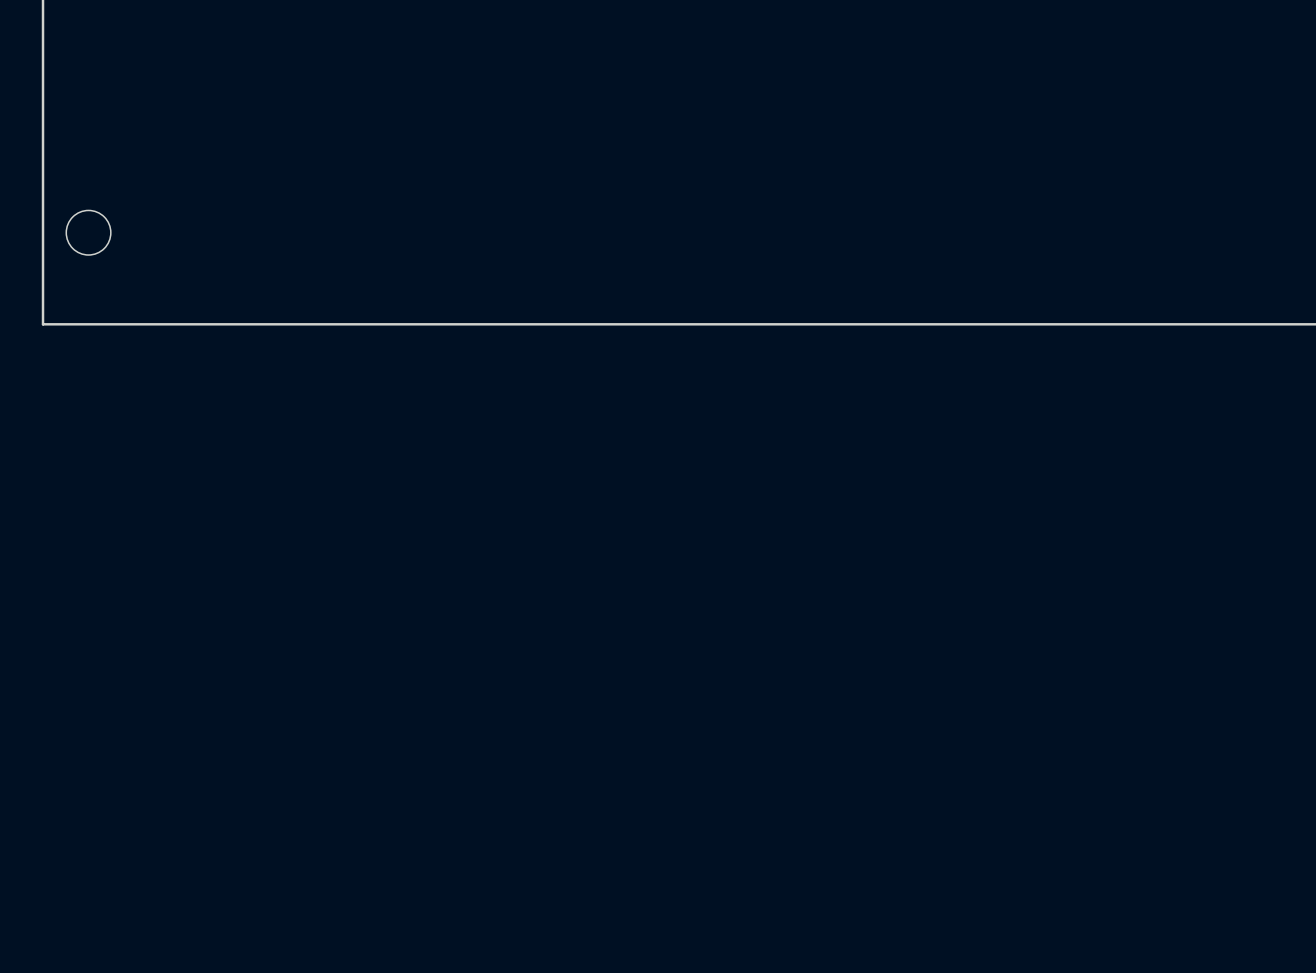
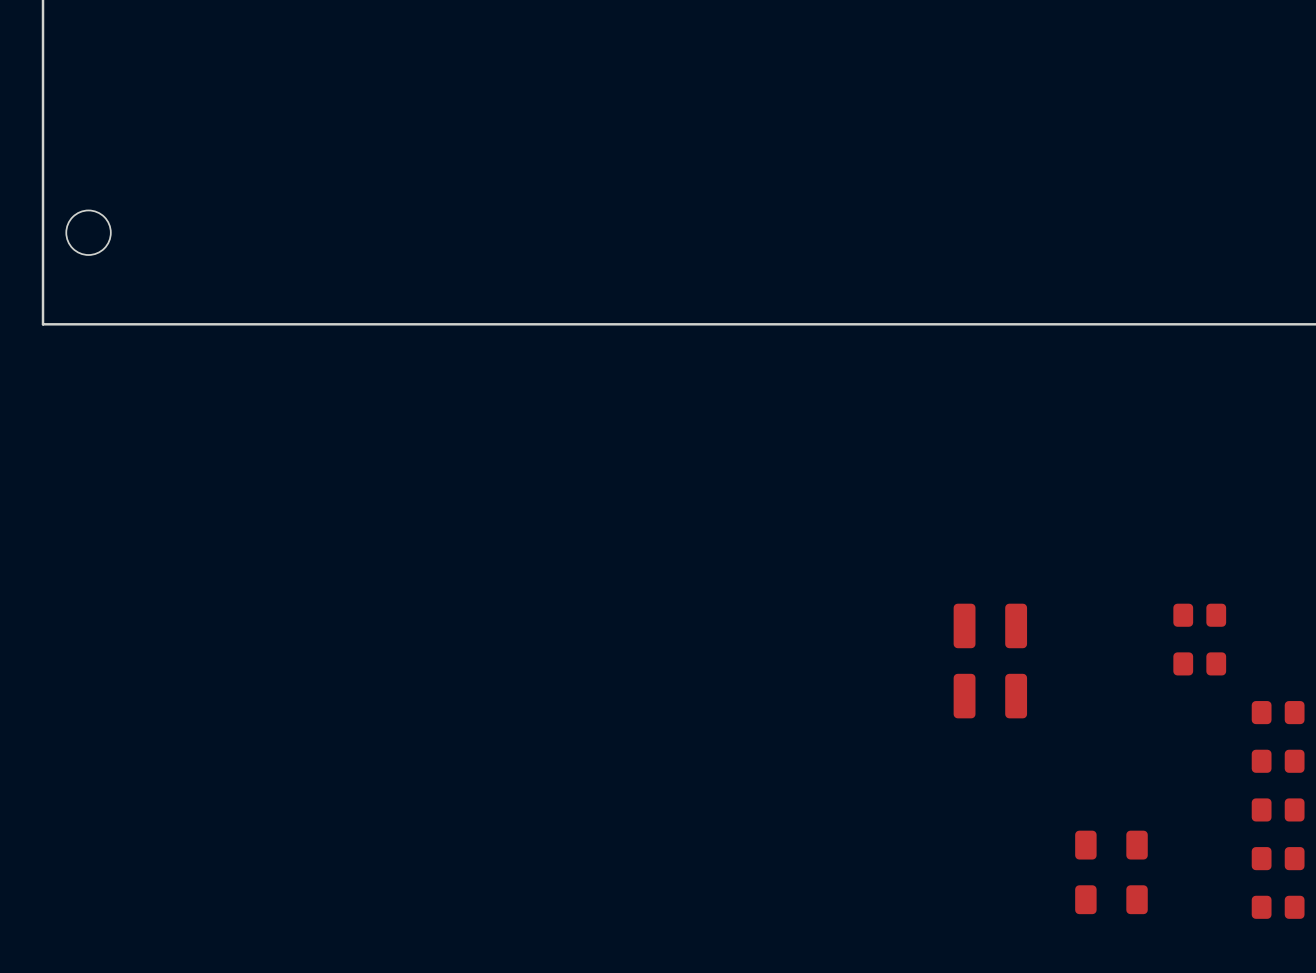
part: none -> (1199, 615)
part: none -> (990, 625)
part: none -> (1199, 663)
part: none -> (990, 696)
part: none -> (1278, 712)
part: none -> (1278, 761)
part: none -> (1278, 809)
part: none -> (1111, 845)
part: none -> (1278, 858)
part: none -> (1111, 899)
part: none -> (1278, 907)

